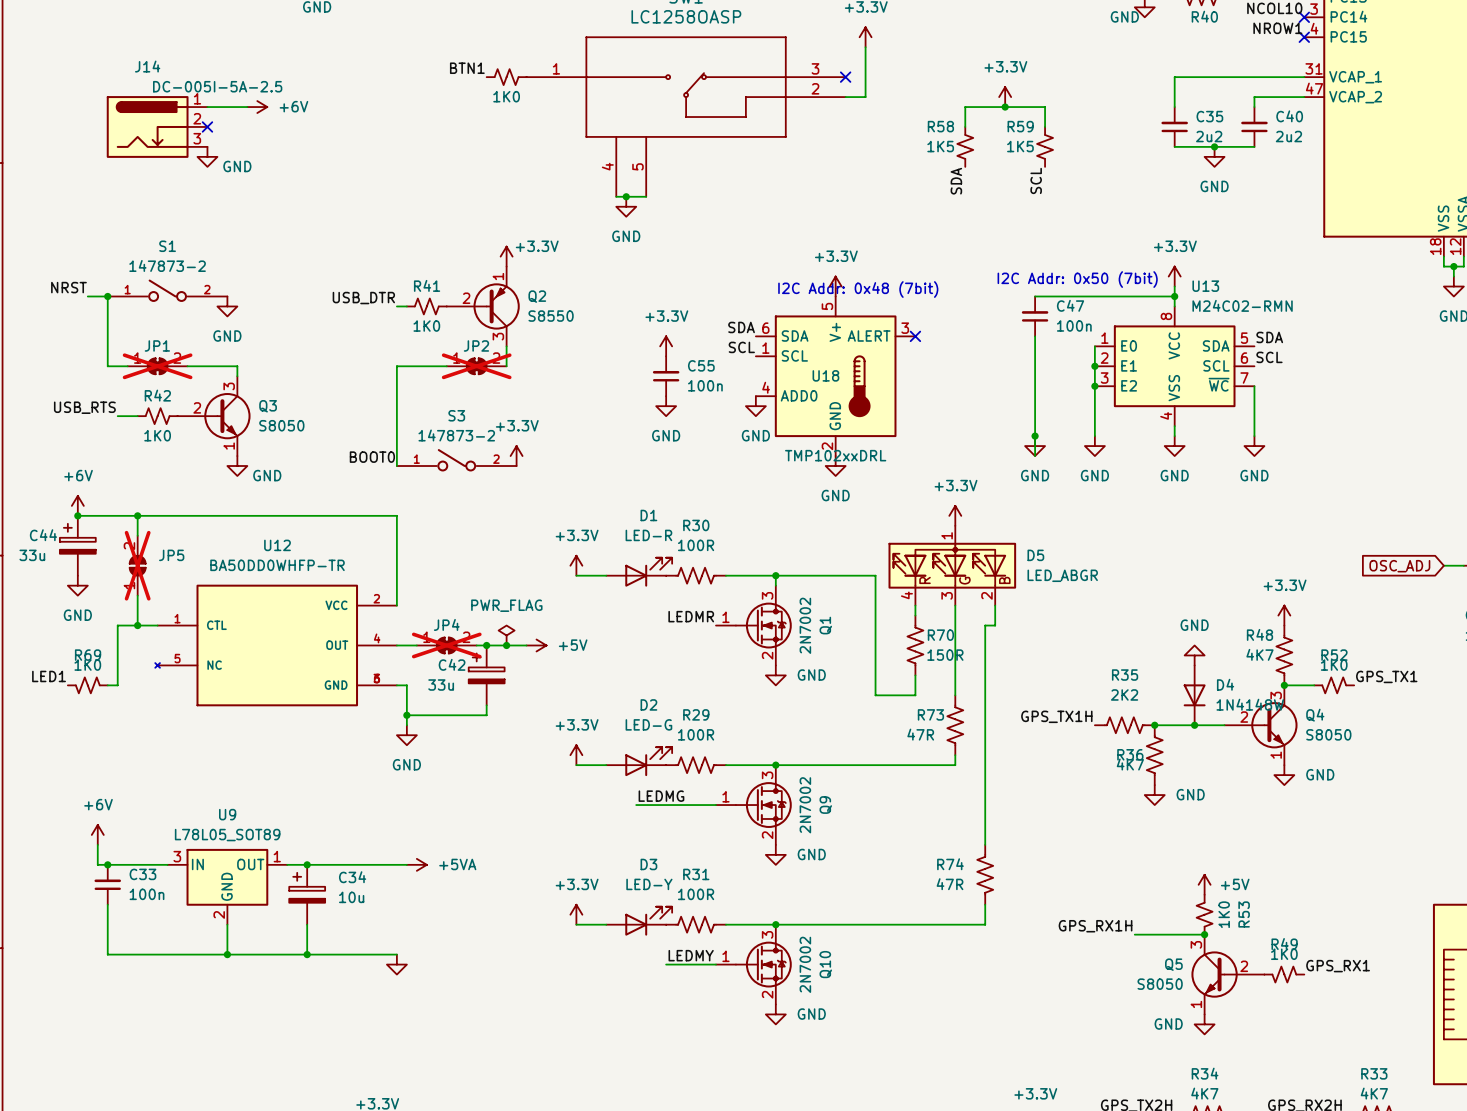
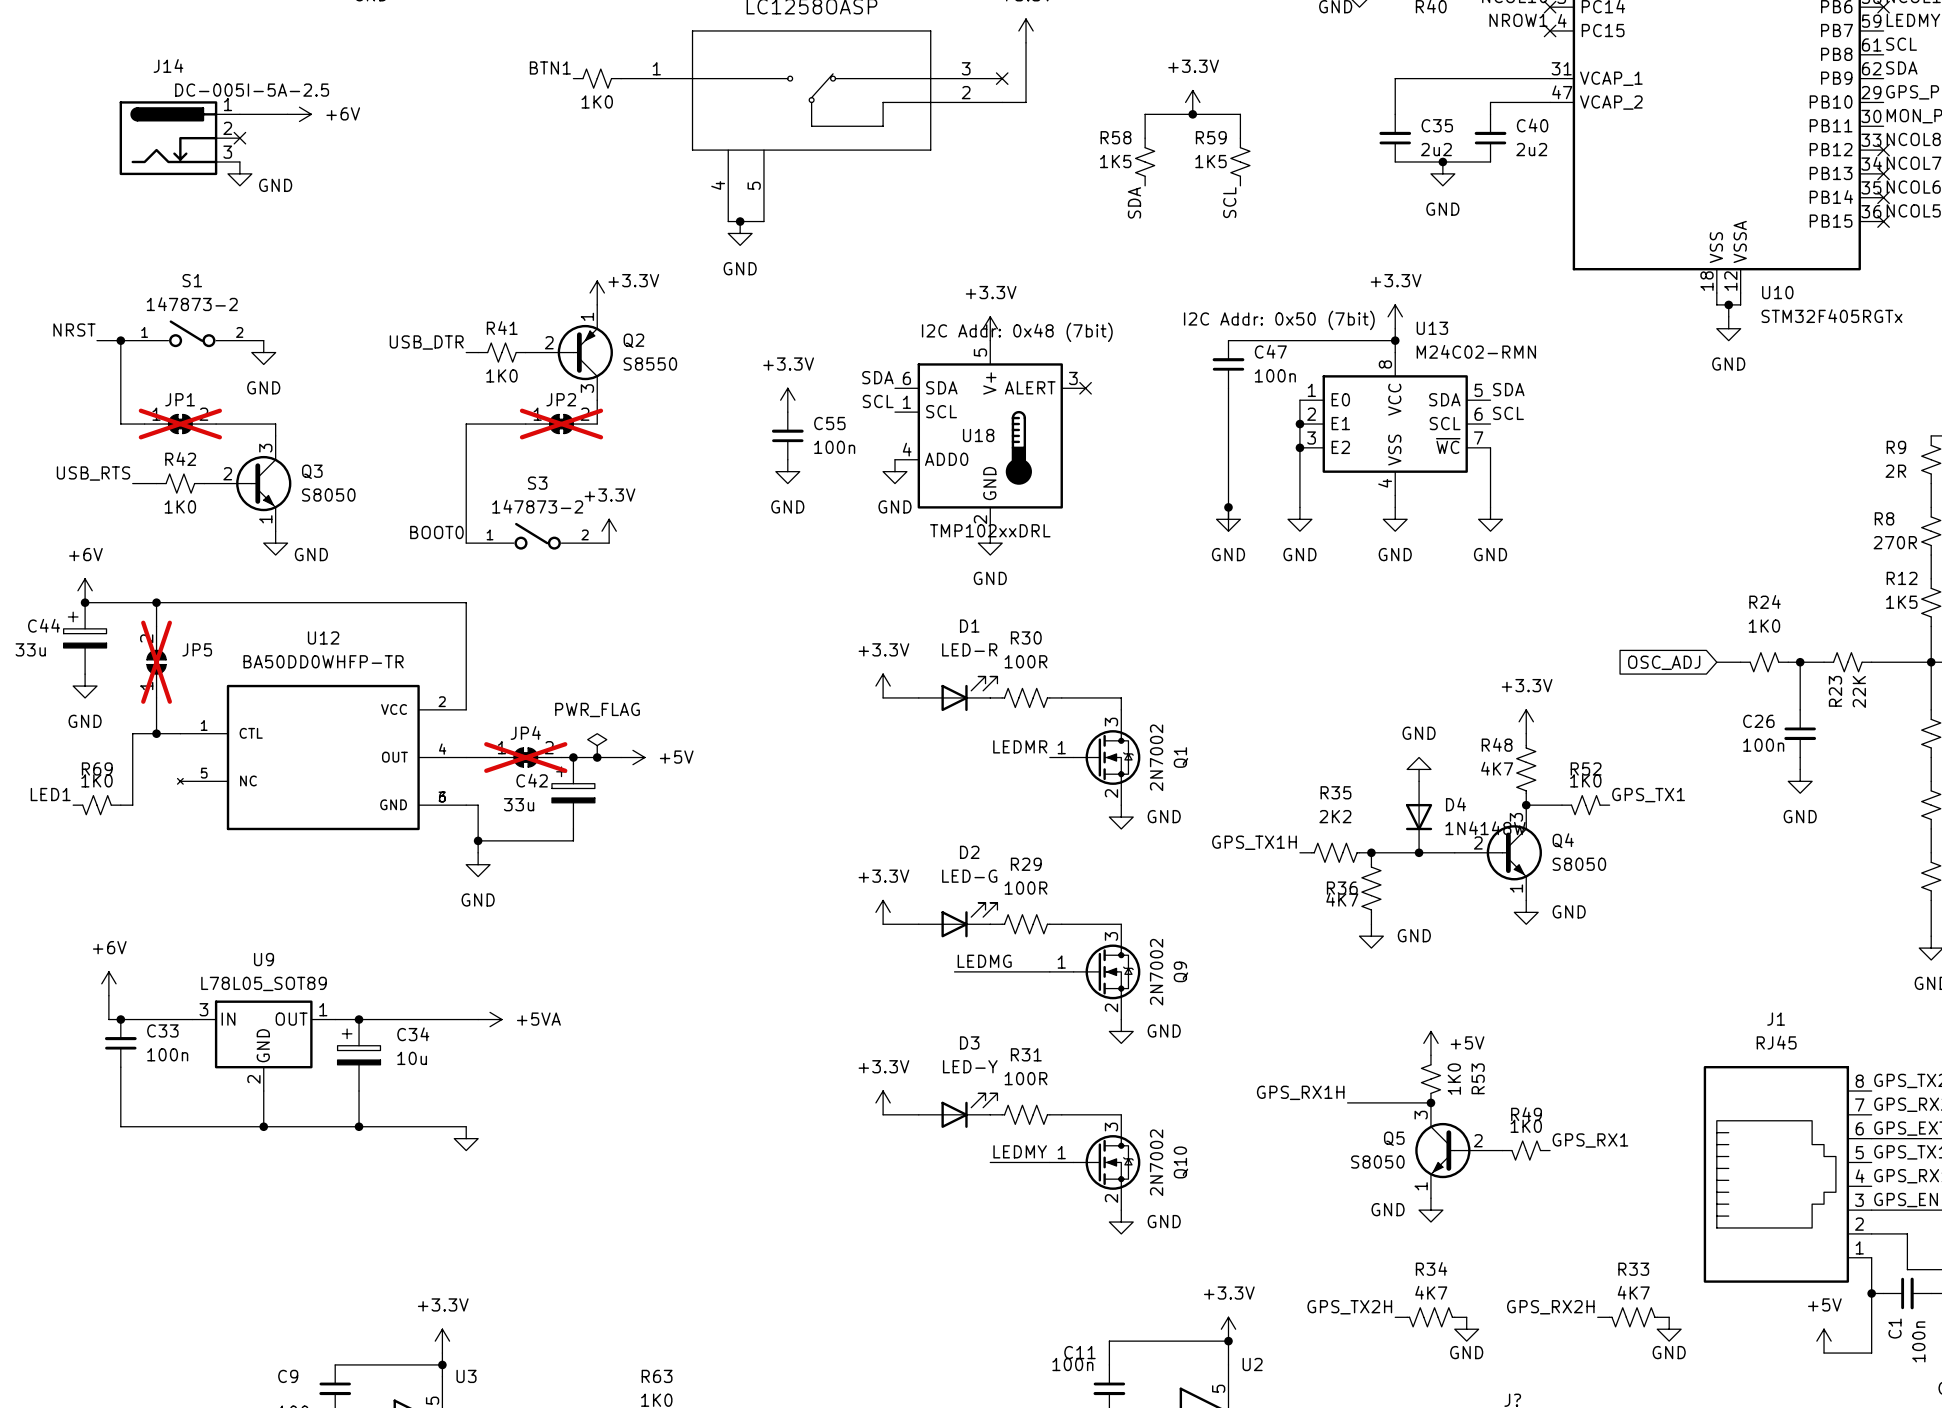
power symbol: +3.3V (955, 515) -> none
power symbol: +3.3V (576, 565) -> none
D5: LED_ABGR (952, 565) -> none
D1 position: (639, 572) -> (958, 693)
wire: (576, 575) (606, 575) -> (883, 697) (918, 697)
R30 position: (696, 575) -> (1026, 697)
wire: (725, 575) (875, 575) (875, 695) (915, 695) (915, 675) -> none
wire: (775, 575) (775, 585) -> none
junction: (775, 575) -> none
power symbol: none -> +3.3V (883, 686)
wire: none -> (1061, 697) (1121, 697) (1121, 709)
wire: (915, 605) (915, 615) -> none
wire: (955, 605) (955, 695) -> none
wire: (995, 605) (995, 625) (985, 625) (985, 844) -> none
label position: LEDMR (691, 616) -> LEDMR (1020, 746)
Q1 position: (753, 625) -> (1095, 757)
R70: 150R (915, 645) -> none
power symbol: GND (775, 675) -> none
power symbol: none -> GND (1121, 817)
R73: 47R (955, 725) -> none
power symbol: +3.3V (576, 755) -> none
wire: (955, 755) (955, 765) (725, 765) -> none
D2 position: (639, 761) -> (958, 920)
wire: (576, 765) (606, 765) -> (883, 924) (918, 924)
R29 position: (696, 765) -> (1026, 924)
junction: (775, 765) -> none
power symbol: none -> +3.3V (883, 912)
wire: none -> (1061, 924) (1121, 924)
label position: LEDMG (661, 796) -> LEDMG (984, 961)
wire: (636, 805) (716, 805) -> (954, 971) (1049, 971)
Q9 position: (753, 805) -> (1095, 971)
power symbol: GND (775, 854) -> none
power symbol: none -> GND (1121, 1031)
R74: 47R (985, 874) -> none
wire: (985, 904) (985, 924) (725, 924) -> none
power symbol: +3.3V (576, 914) -> none
D3 position: (639, 921) -> (958, 1110)
wire: (576, 924) (606, 924) -> (883, 1114) (918, 1114)
R31 position: (696, 924) -> (1026, 1114)
junction: (775, 924) -> none
power symbol: none -> +3.3V (883, 1102)
wire: none -> (1061, 1114) (1121, 1114)
label position: LEDMY (691, 955) -> LEDMY (1020, 1151)
wire: (666, 964) (716, 964) -> (990, 1162) (1049, 1162)
Q10 position: (753, 964) -> (1095, 1162)
power symbol: GND (775, 1014) -> none
power symbol: none -> GND (1121, 1222)

